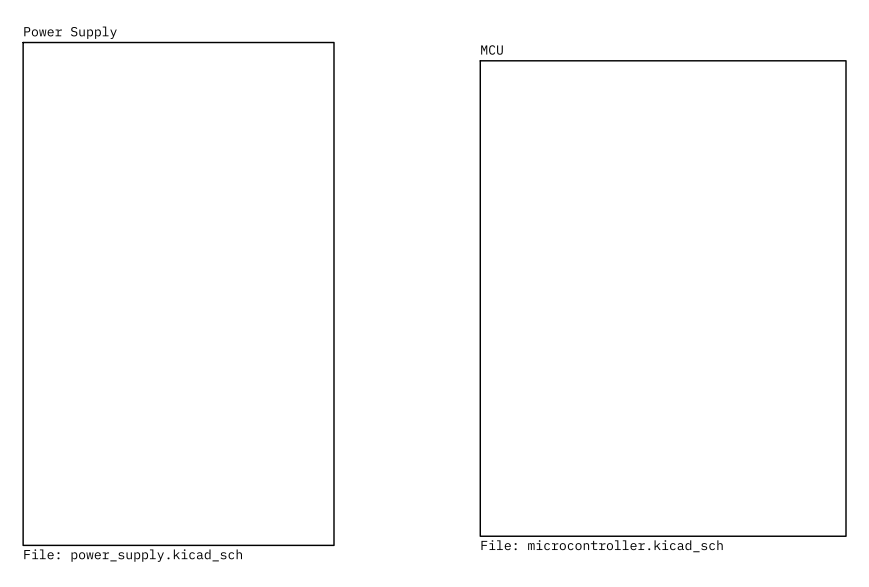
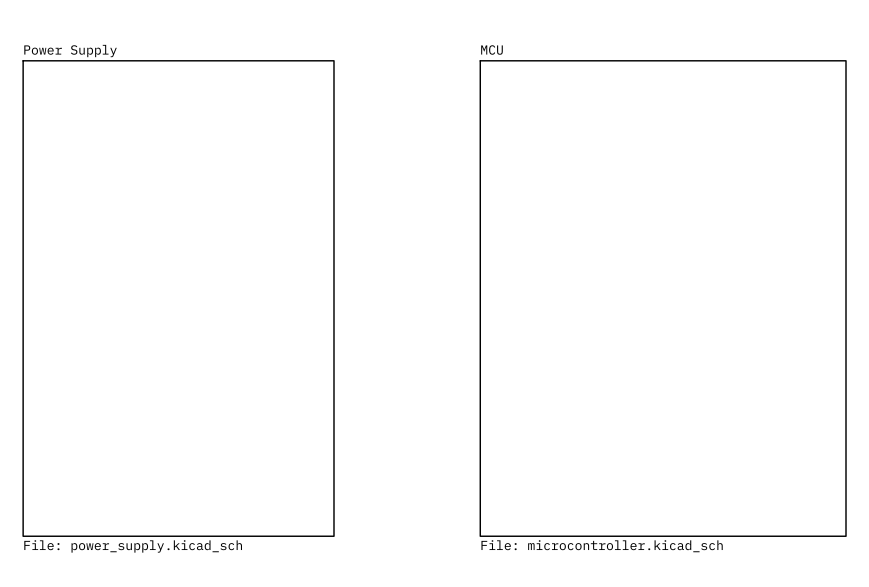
sheet Power Supply shape: [22, 41, 335, 546] -> [22, 60, 335, 537]

